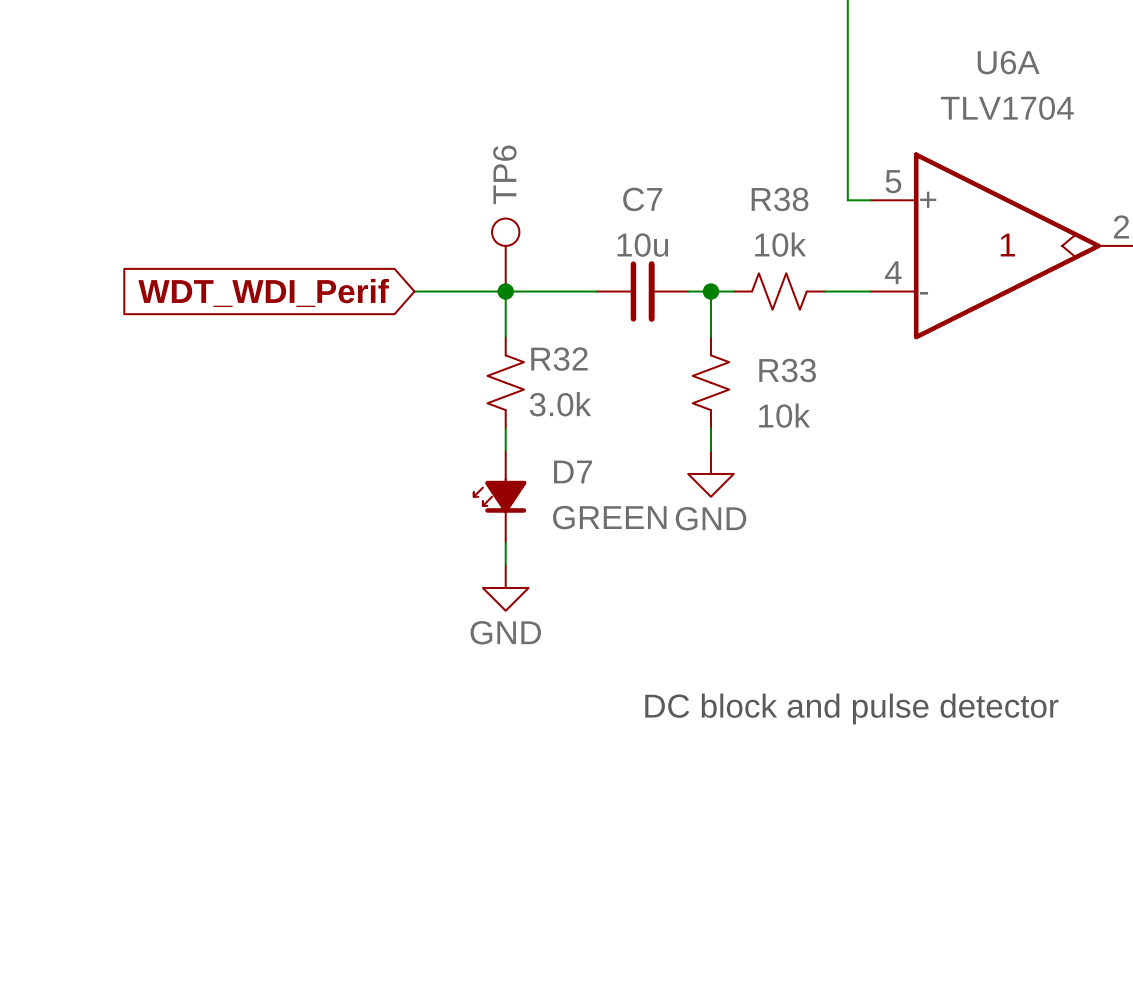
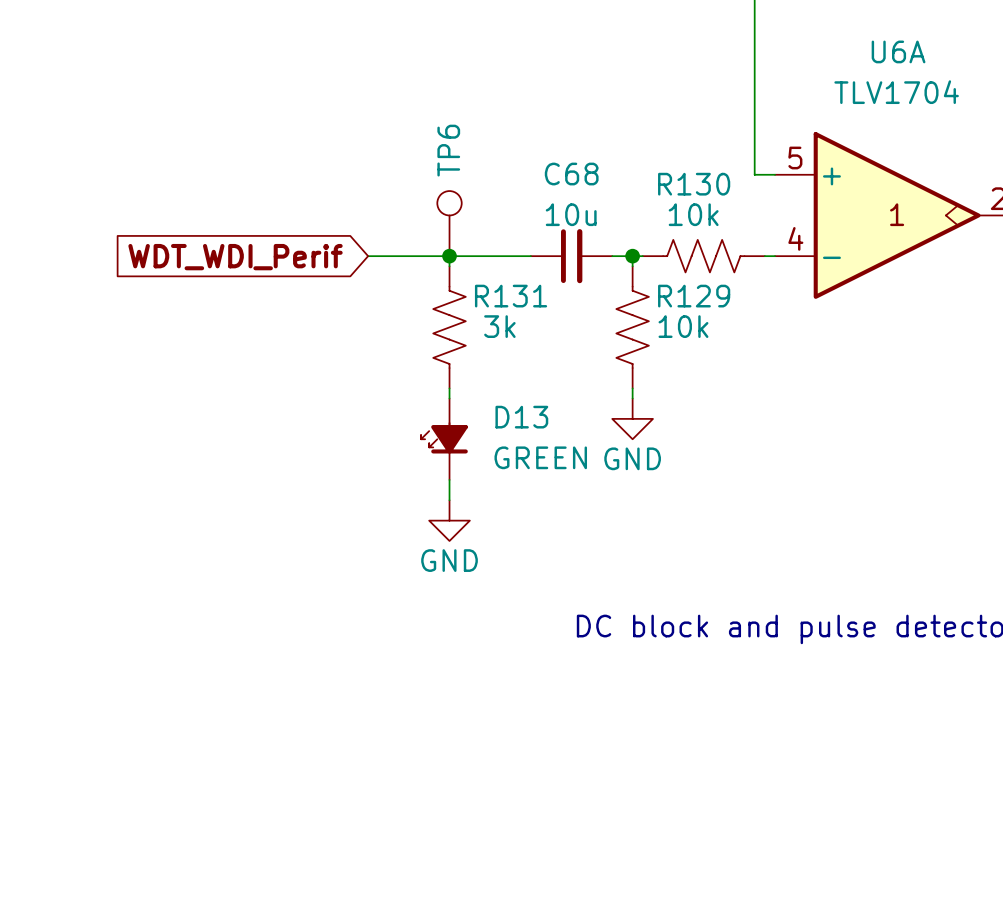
C7 name: C7 (642, 199) -> C68 (571, 174)
R38: 10k (779, 291) -> none
R130: none -> 10k (703, 256)
R131: none -> 3k (449, 327)
R129: none -> 10k (632, 327)
R32: 3.0k (505, 382) -> none
R33: 10k (710, 382) -> none
D7 name: D7 (573, 471) -> D13 (521, 417)

